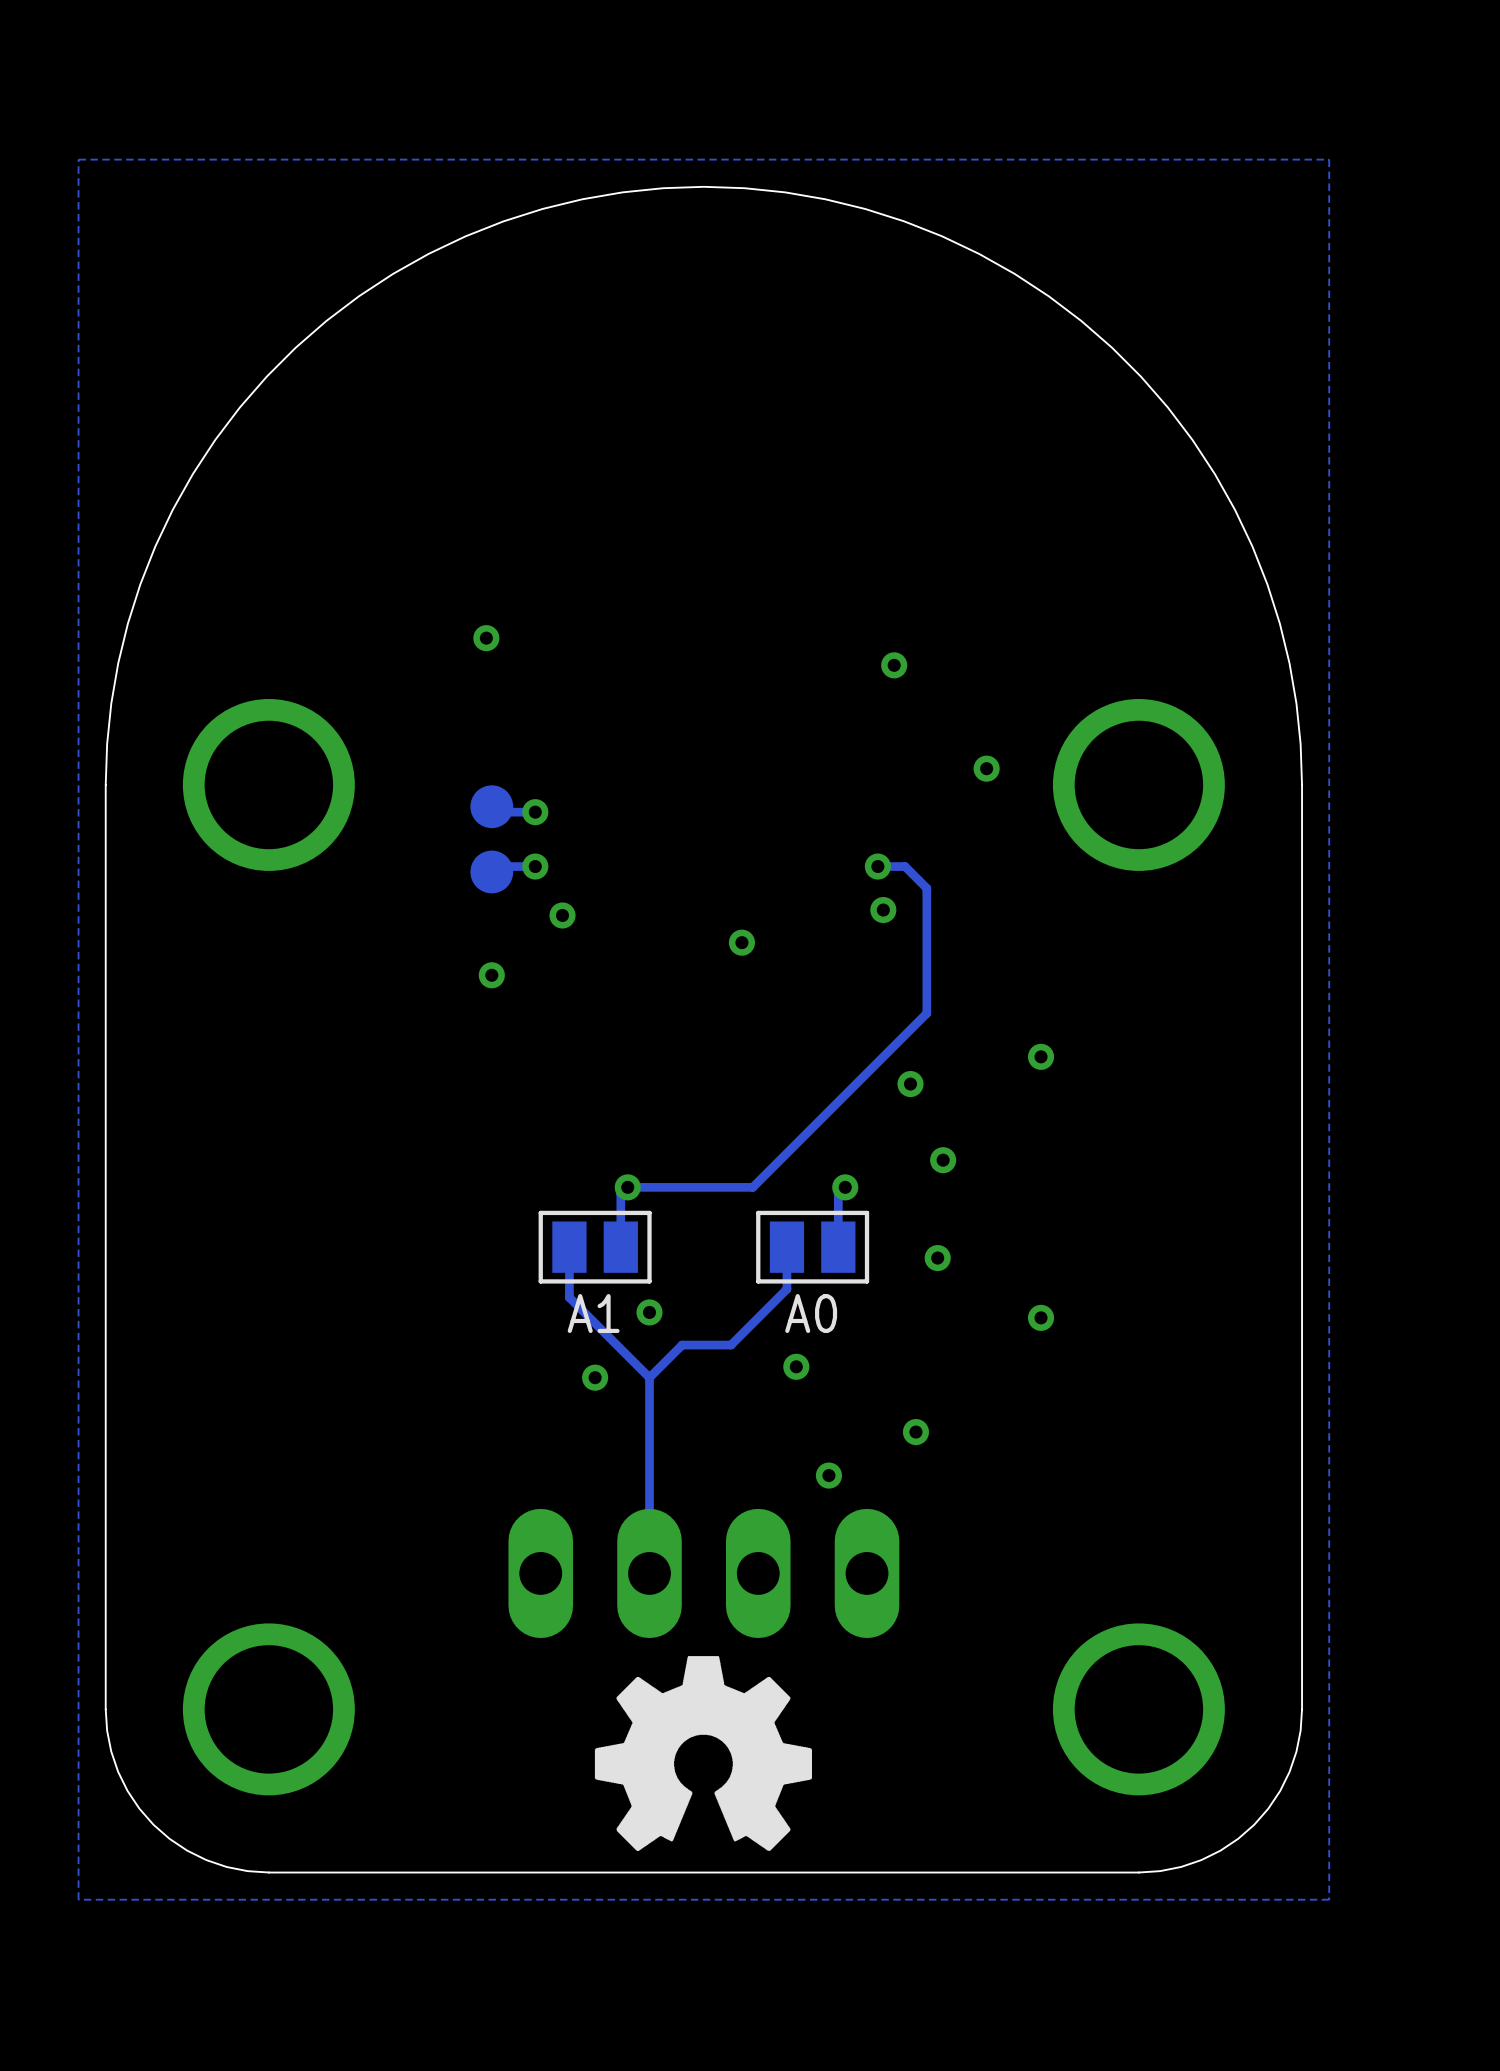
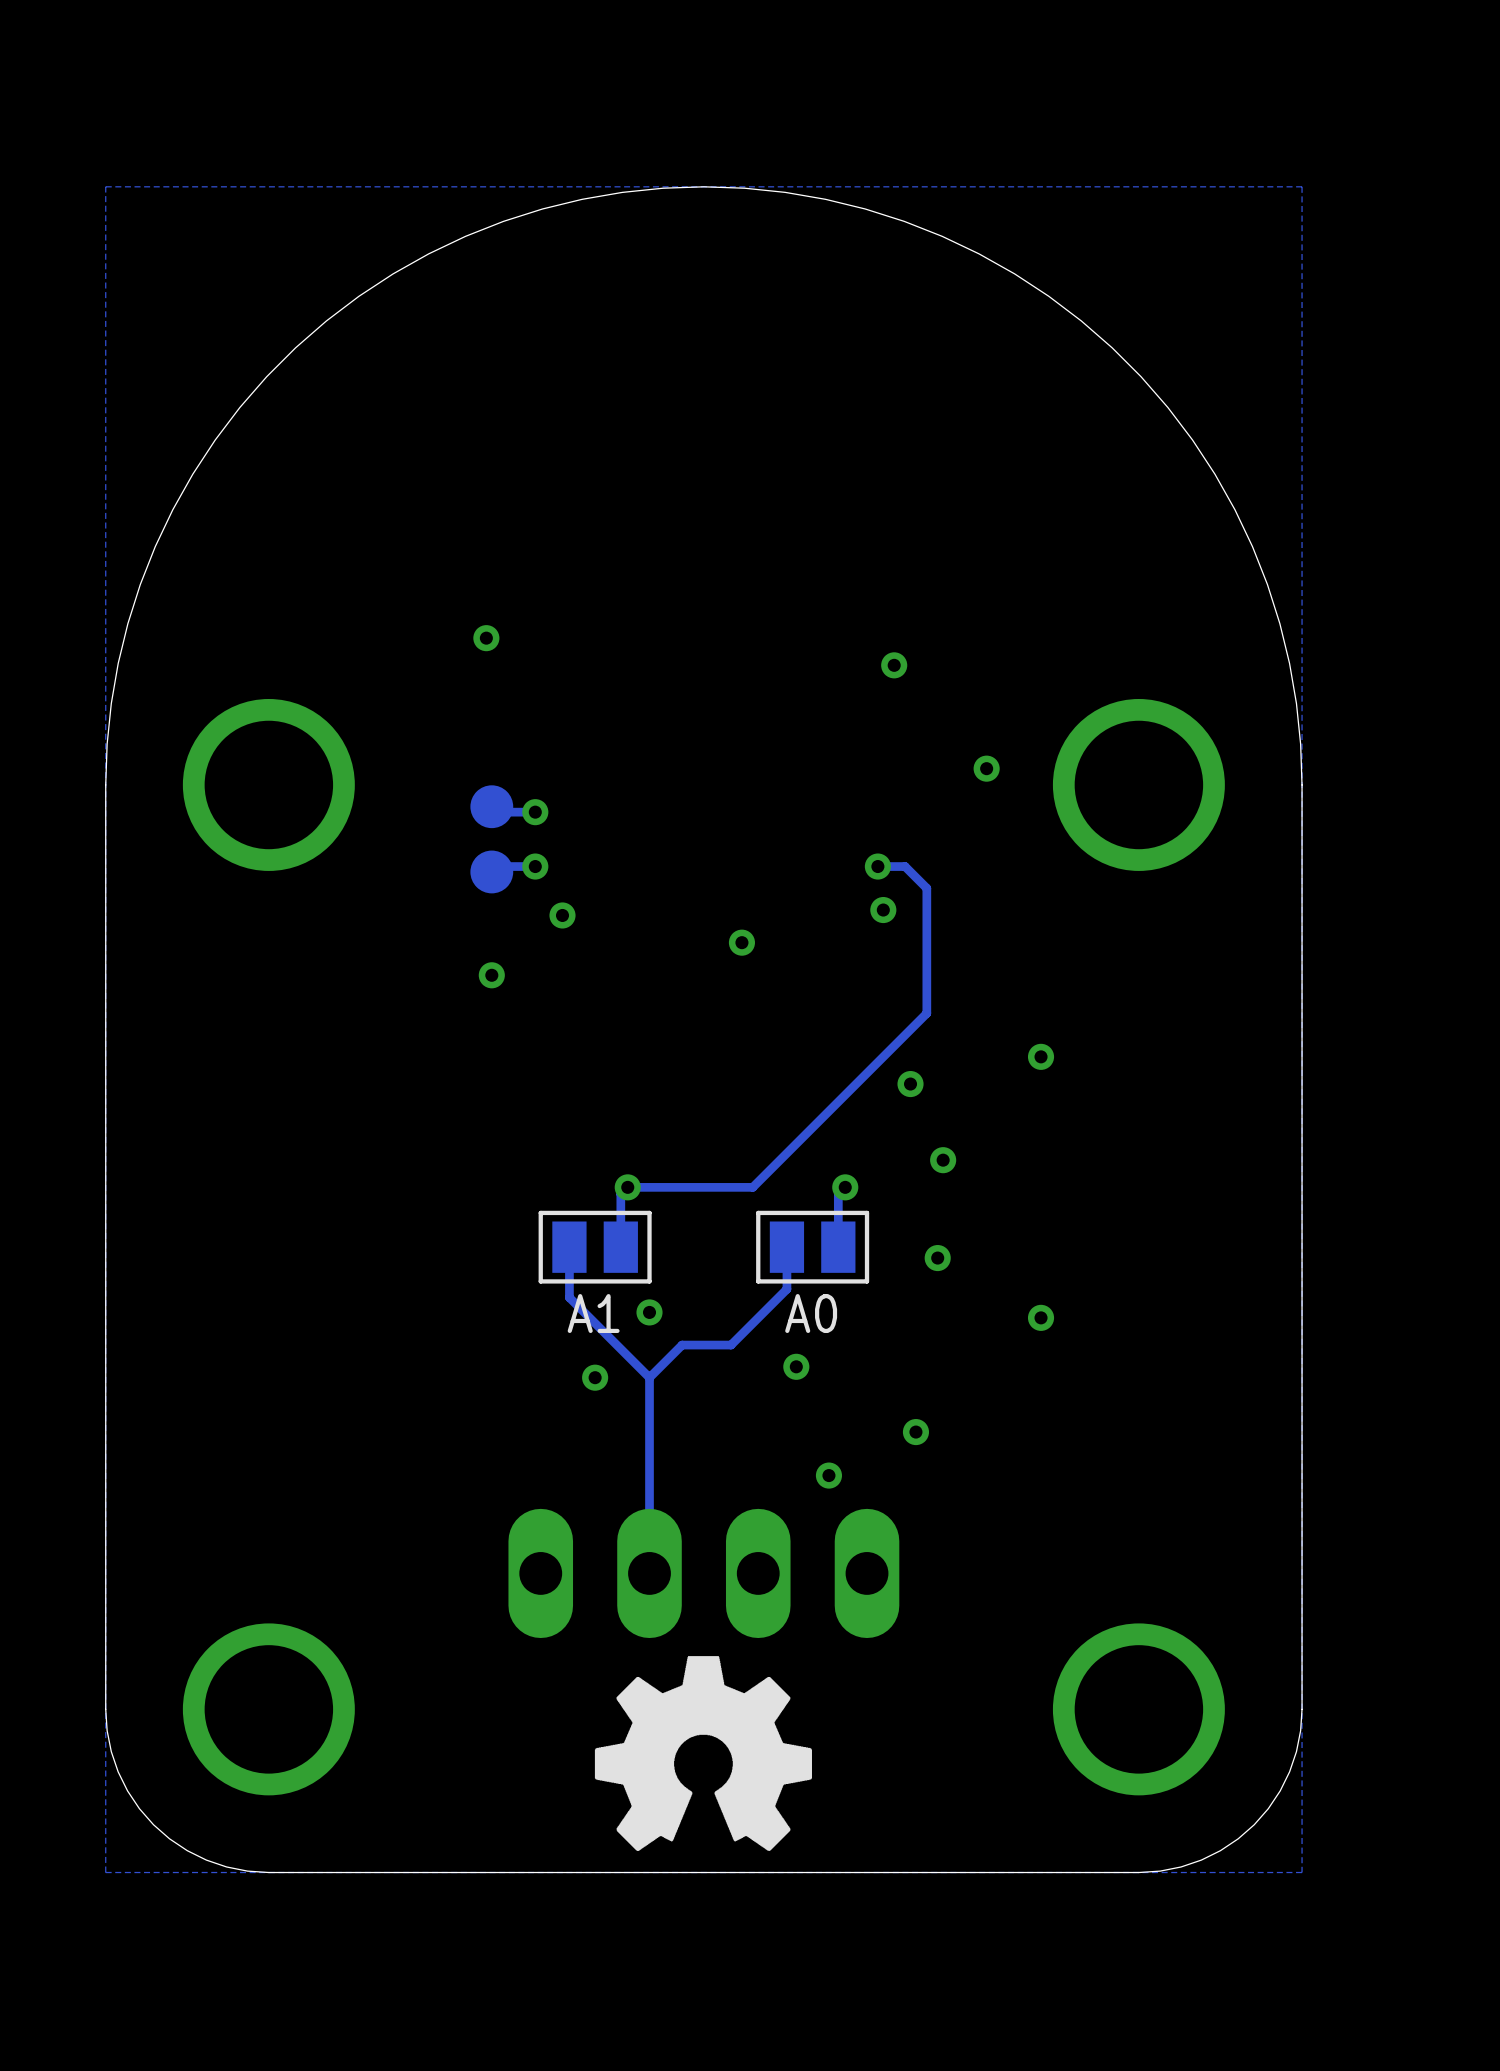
zone outline: (1329, 159) (78, 159) (78, 1899) (1329, 1899) (1329, 159) -> (1302, 186) (1302, 1872) (105, 1872) (105, 186) (1302, 186)

